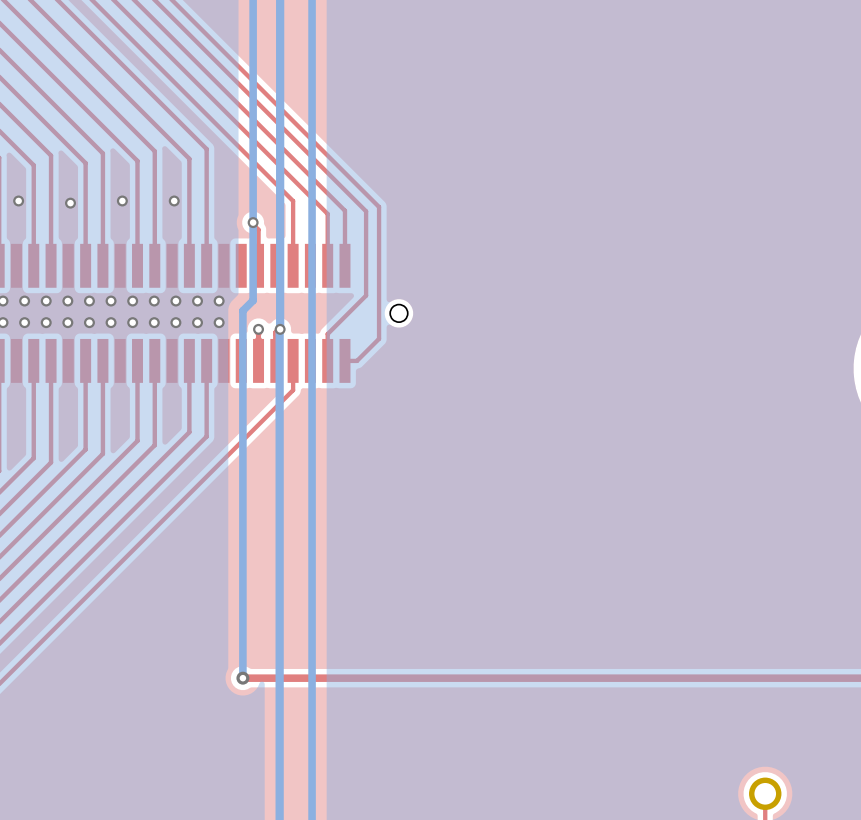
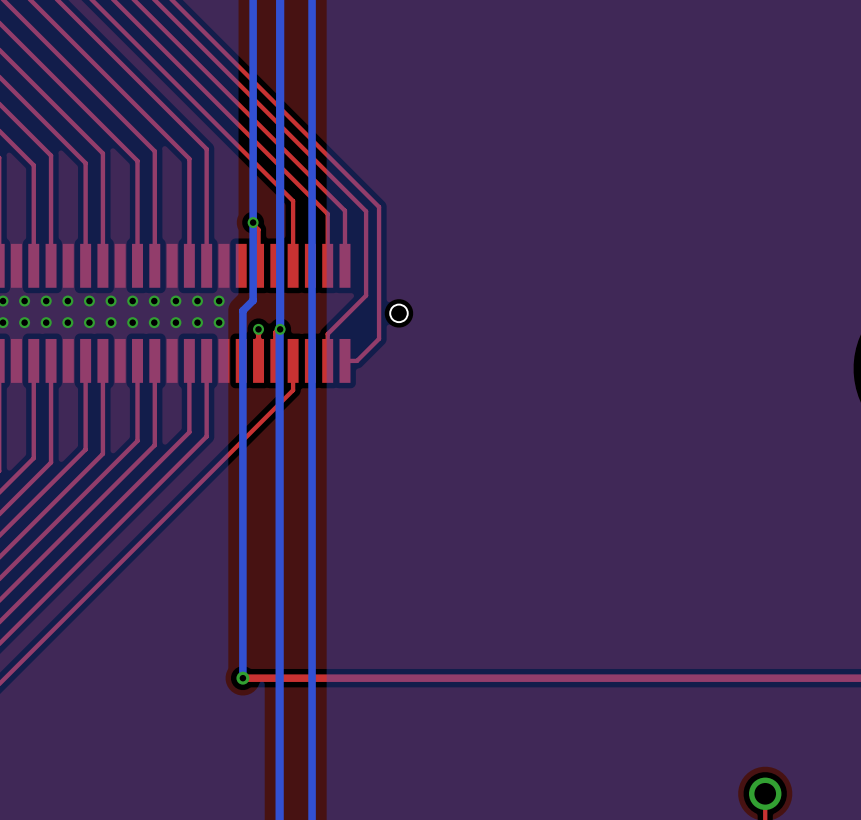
via: (18, 200) -> none
via: (122, 200) -> none
via: (174, 200) -> none
via: (70, 203) -> none

